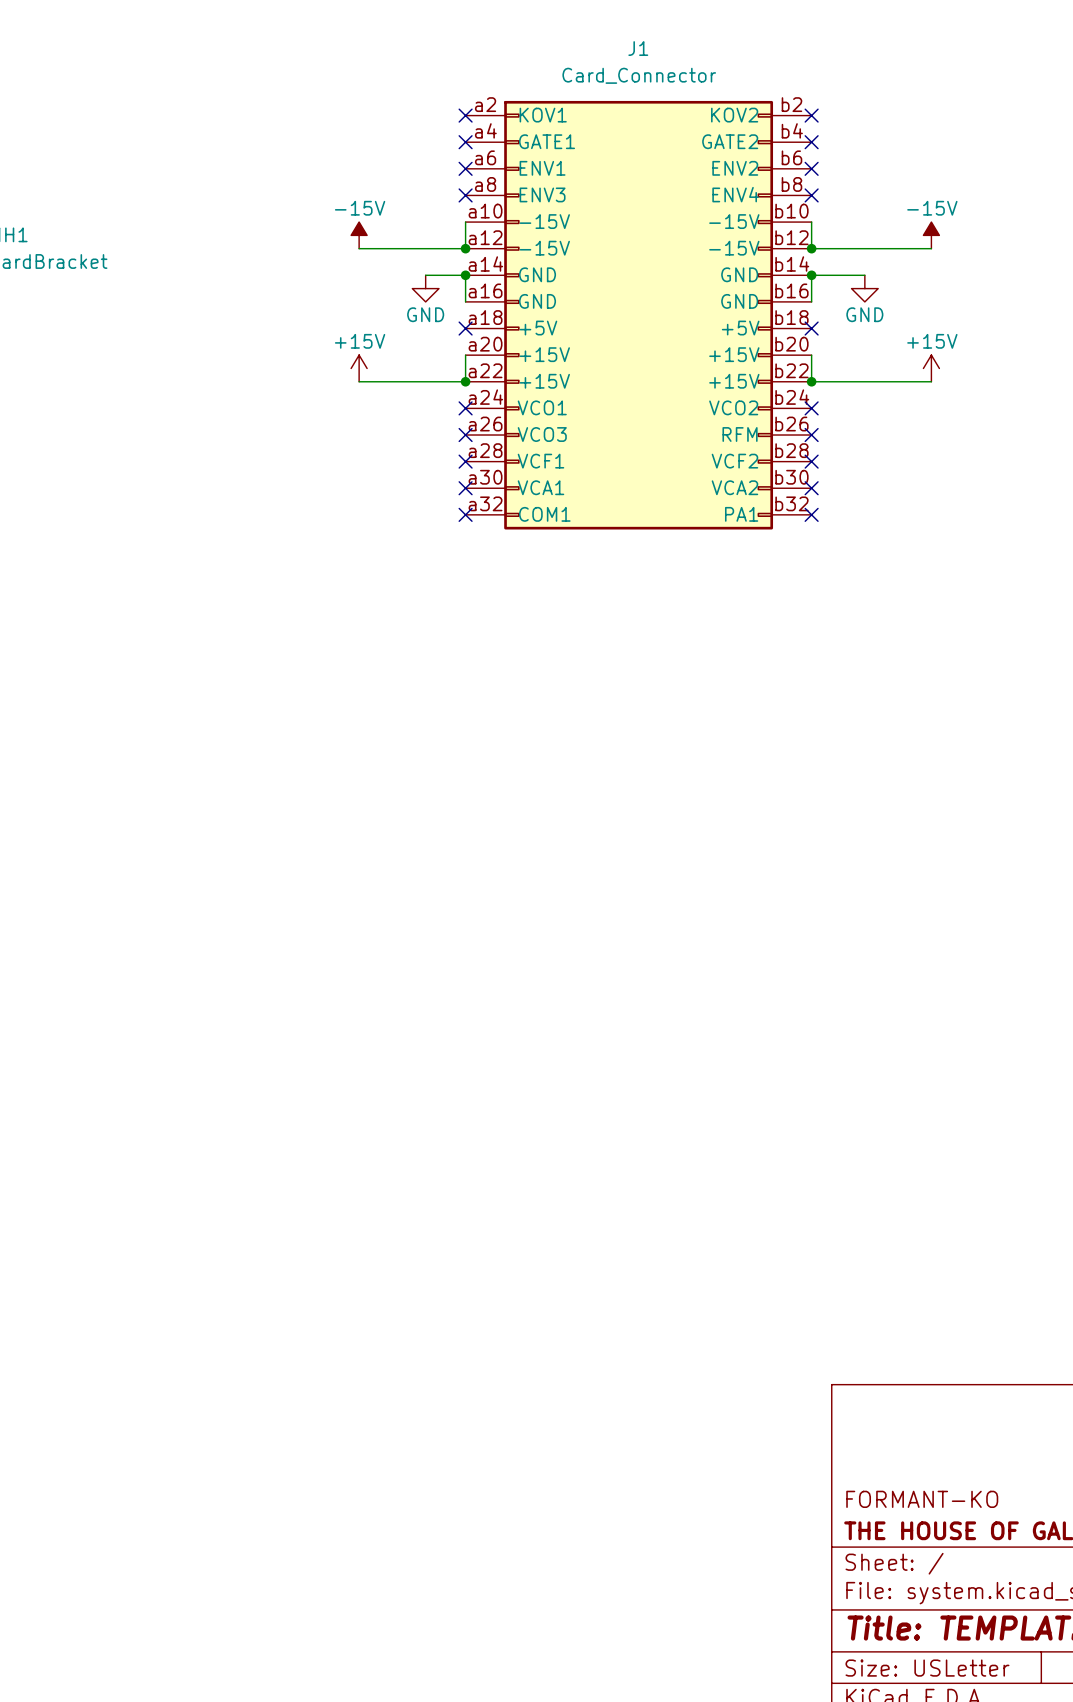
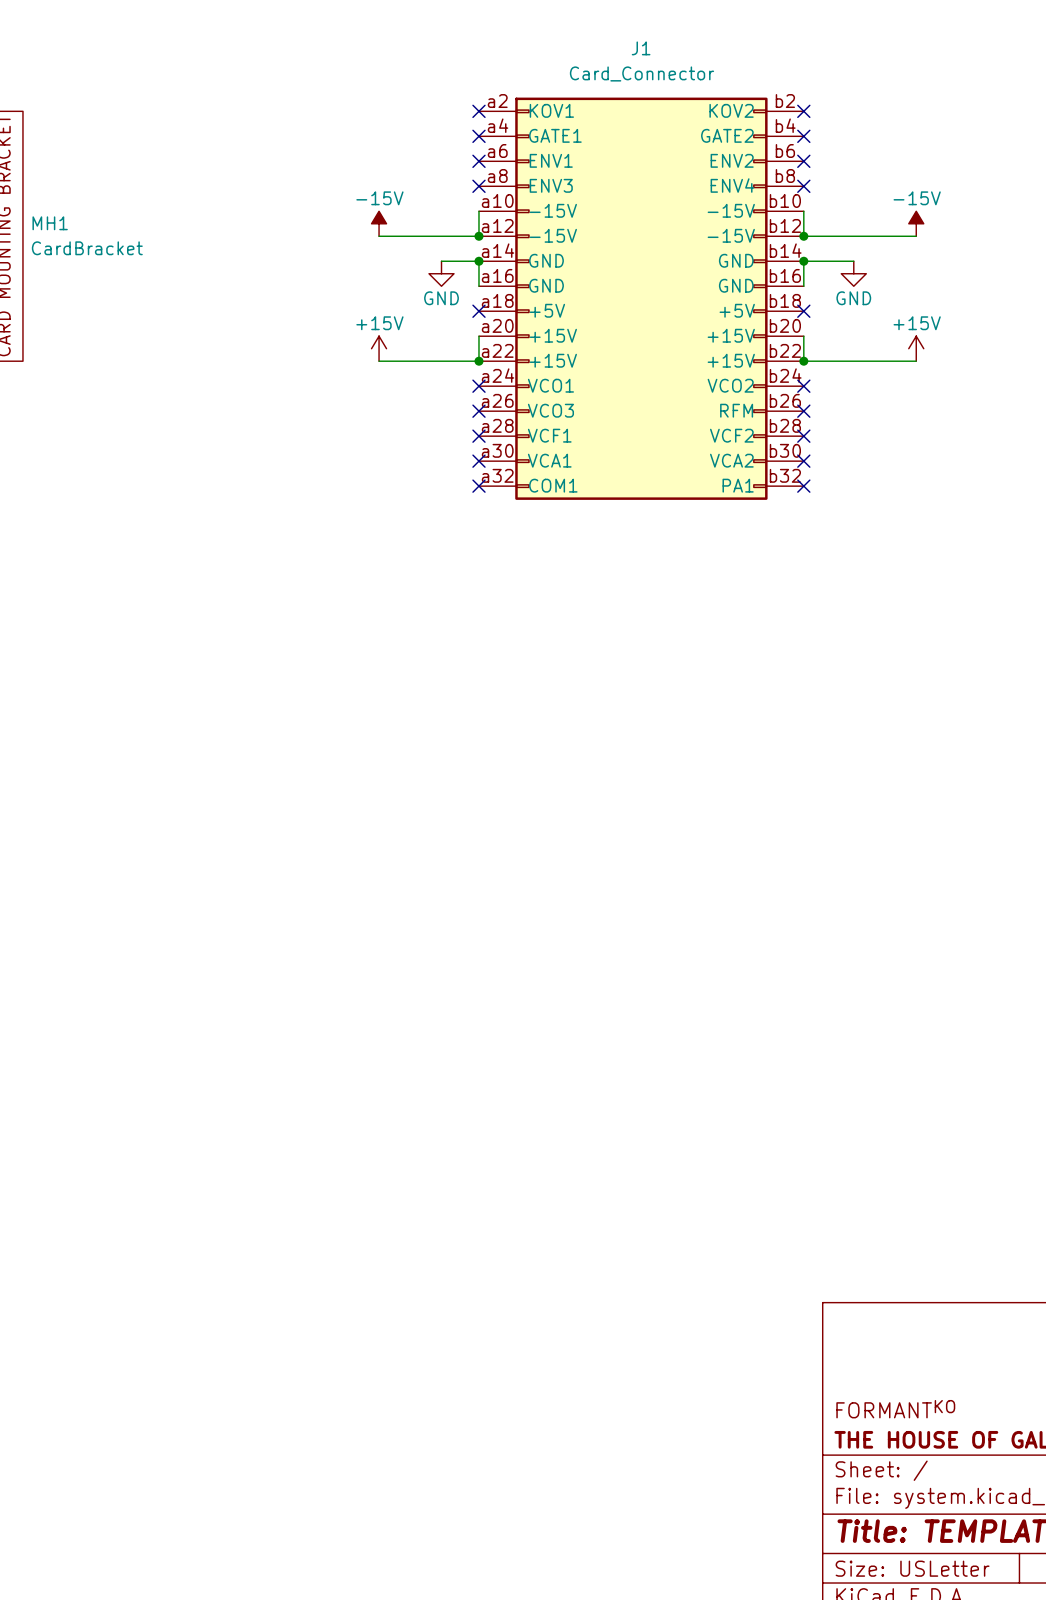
title block: FORMANT-KO (922, 1499) -> FORMANTKO (895, 1409)

